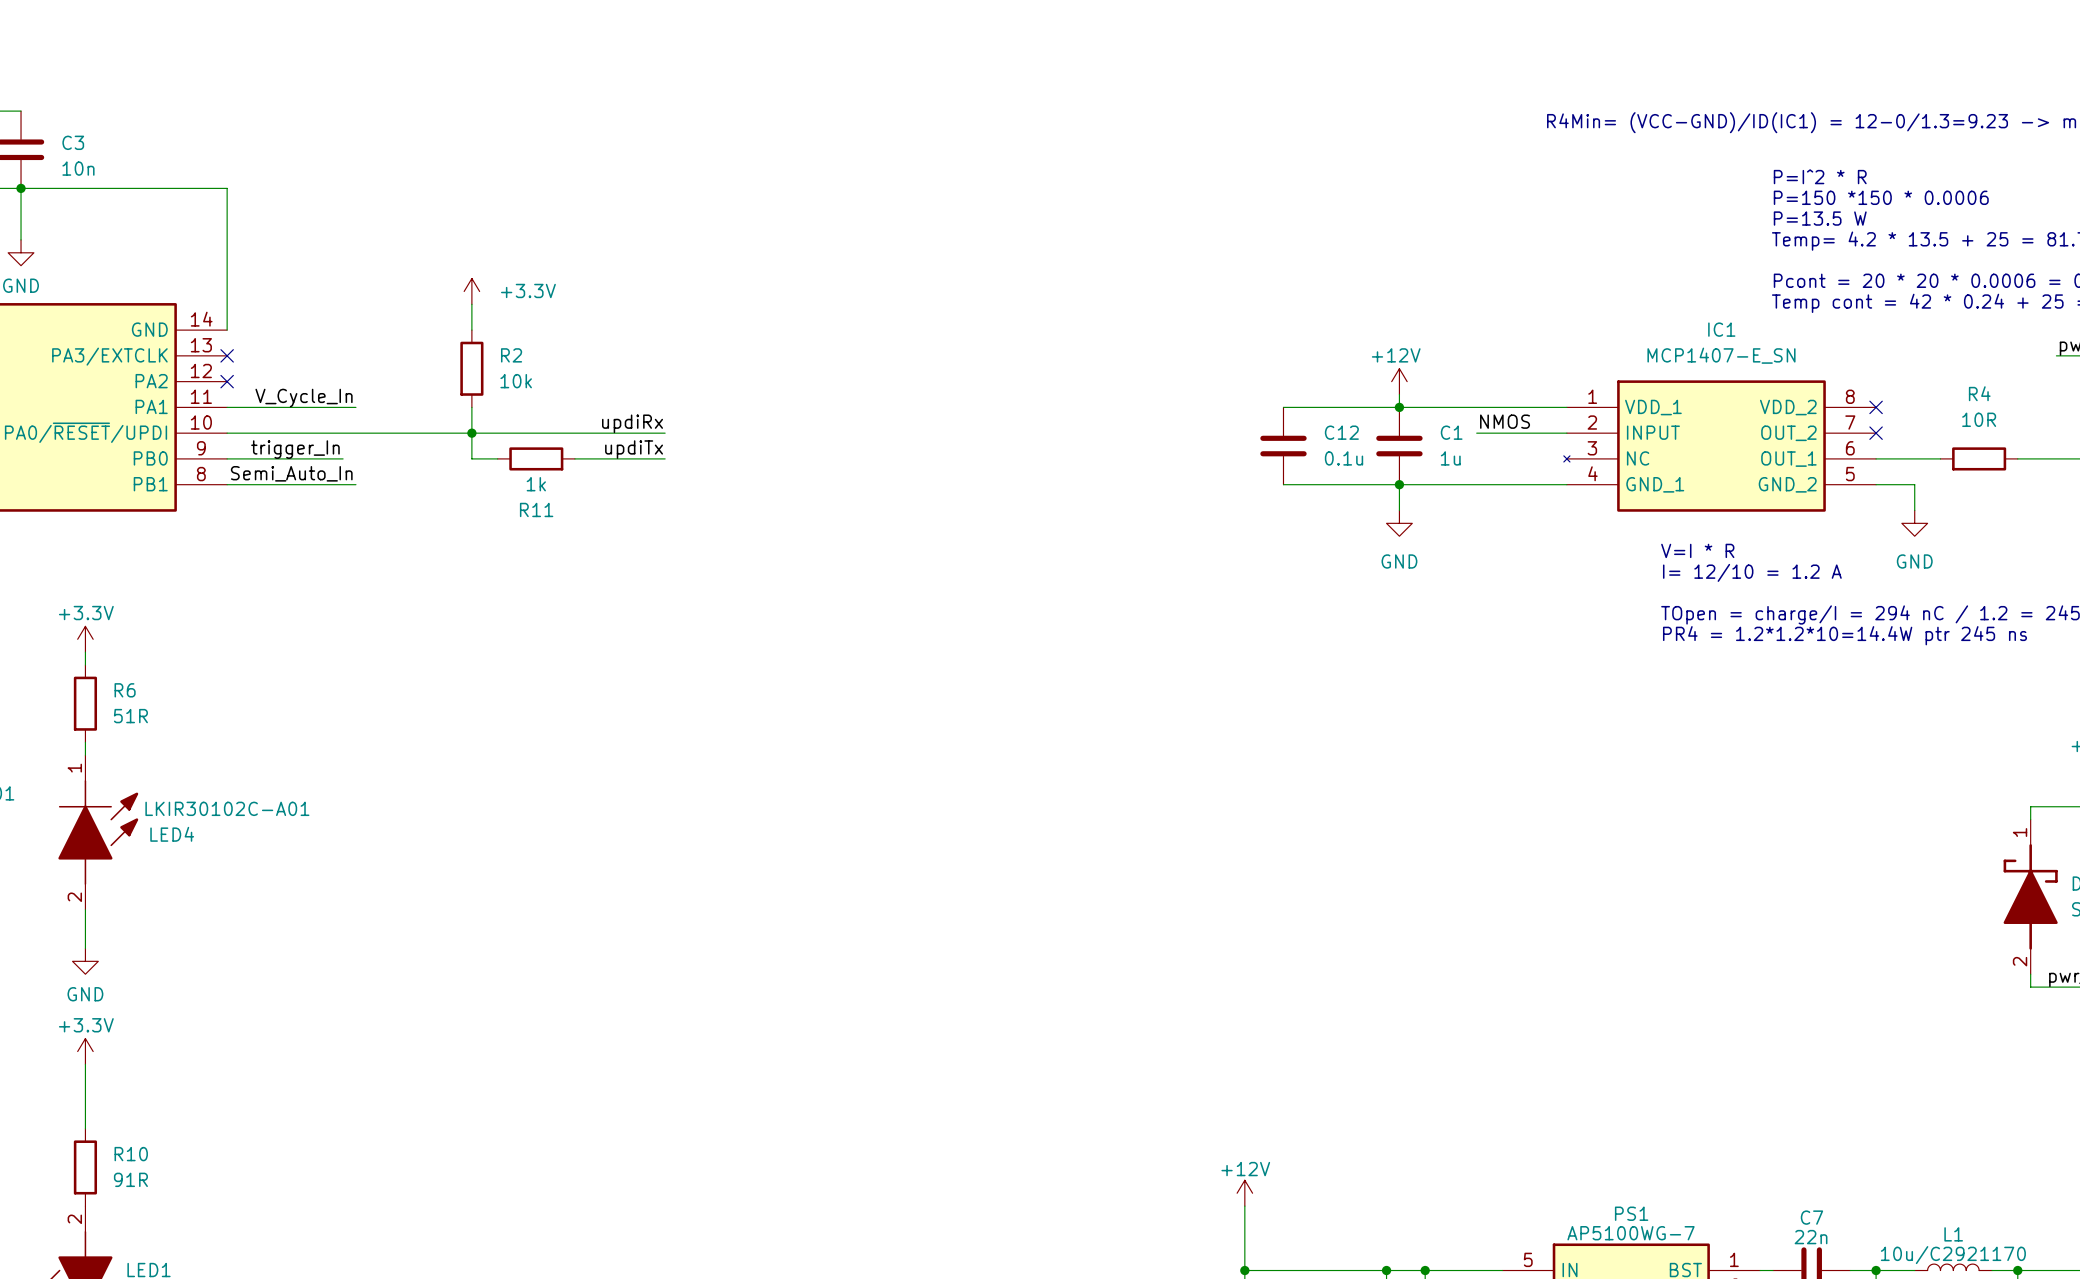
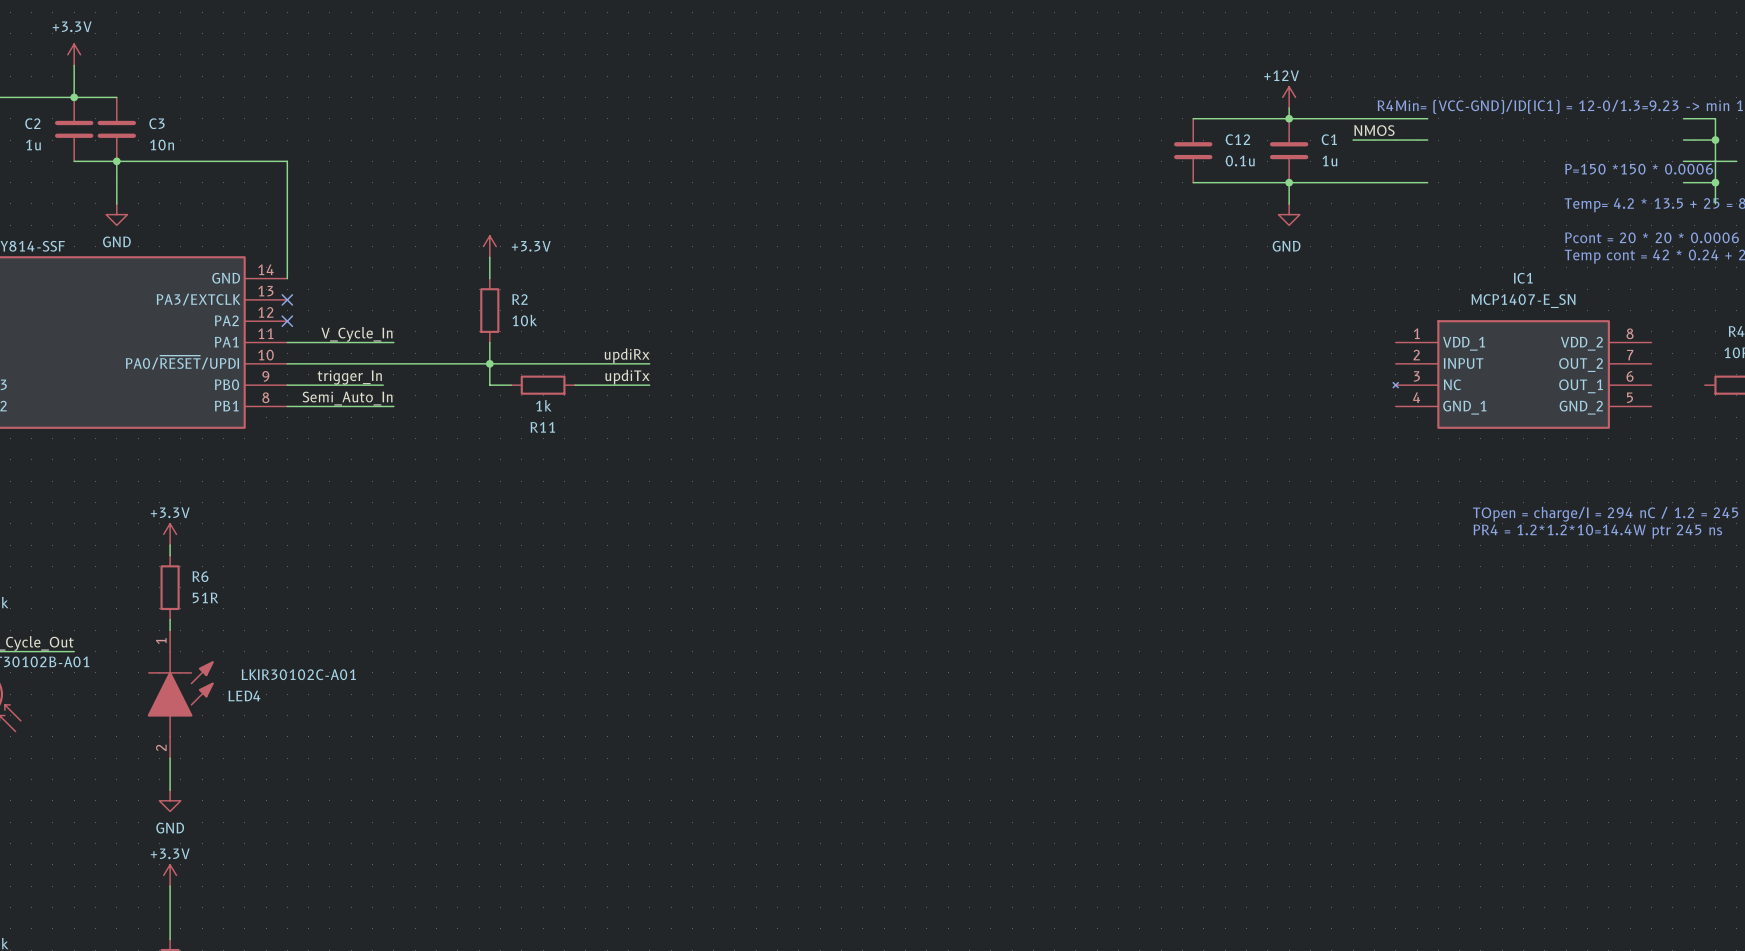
power symbol: none -> +12V (1289, 97)
wire: none -> (1289, 108) (1289, 118)
wire: none -> (1193, 118) (1427, 118)
junction: none -> (1289, 118)
wire: none -> (1683, 118) (1715, 118) (1715, 203)
label: none -> NMOS (1374, 130)
wire: none -> (1353, 140) (1427, 140)
wire: none -> (1683, 140) (1715, 140)
junction: none -> (1715, 140)
text: P=I^2 * R (1820, 176) -> none
wire: none -> (1683, 161) (1736, 161)
wire: none -> (1289, 182) (1289, 203)
junction: none -> (1289, 182)
wire: none -> (1683, 182) (1715, 182)
junction: none -> (1715, 182)
text: P=13.5 W (1820, 218) -> none
power symbol: none -> GND (1289, 214)
power symbol: +12V (1399, 381) -> none
wire: (1399, 394) (1399, 407) -> none
wire: (1283, 407) (1566, 407) -> (1193, 182) (1427, 182)
junction: (1399, 407) -> none
no-connect mark: (1876, 407) -> none
label: NMOS (1505, 421) -> none
wire: (1476, 433) (1566, 433) -> none
no-connect mark: (1876, 433) -> none
C12 position: (1283, 446) -> (1193, 150)
C1 position: (1399, 446) -> (1289, 150)
wire: (1876, 458) (1940, 458) -> none
wire: (1283, 484) (1566, 484) -> none
wire: (1399, 484) (1399, 510) -> none
junction: (1399, 484) -> none
wire: (1876, 484) (1914, 484) (1914, 510) -> none
power symbol: GND (1399, 523) -> none
power symbol: GND (1914, 523) -> none
text: V=I * R (1697, 550) -> none
text: I= 12/10 = 1.2 A (1752, 572) -> none

